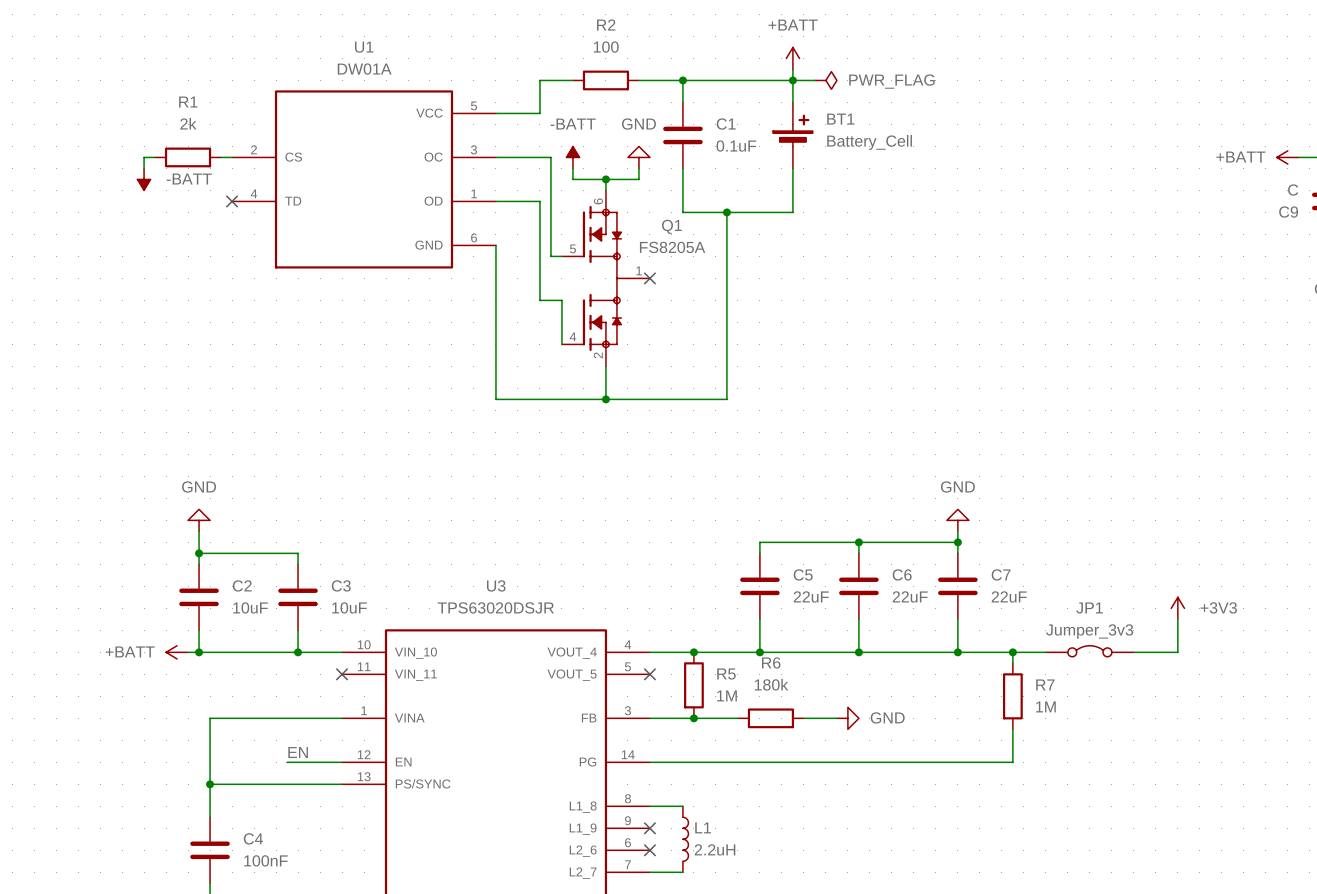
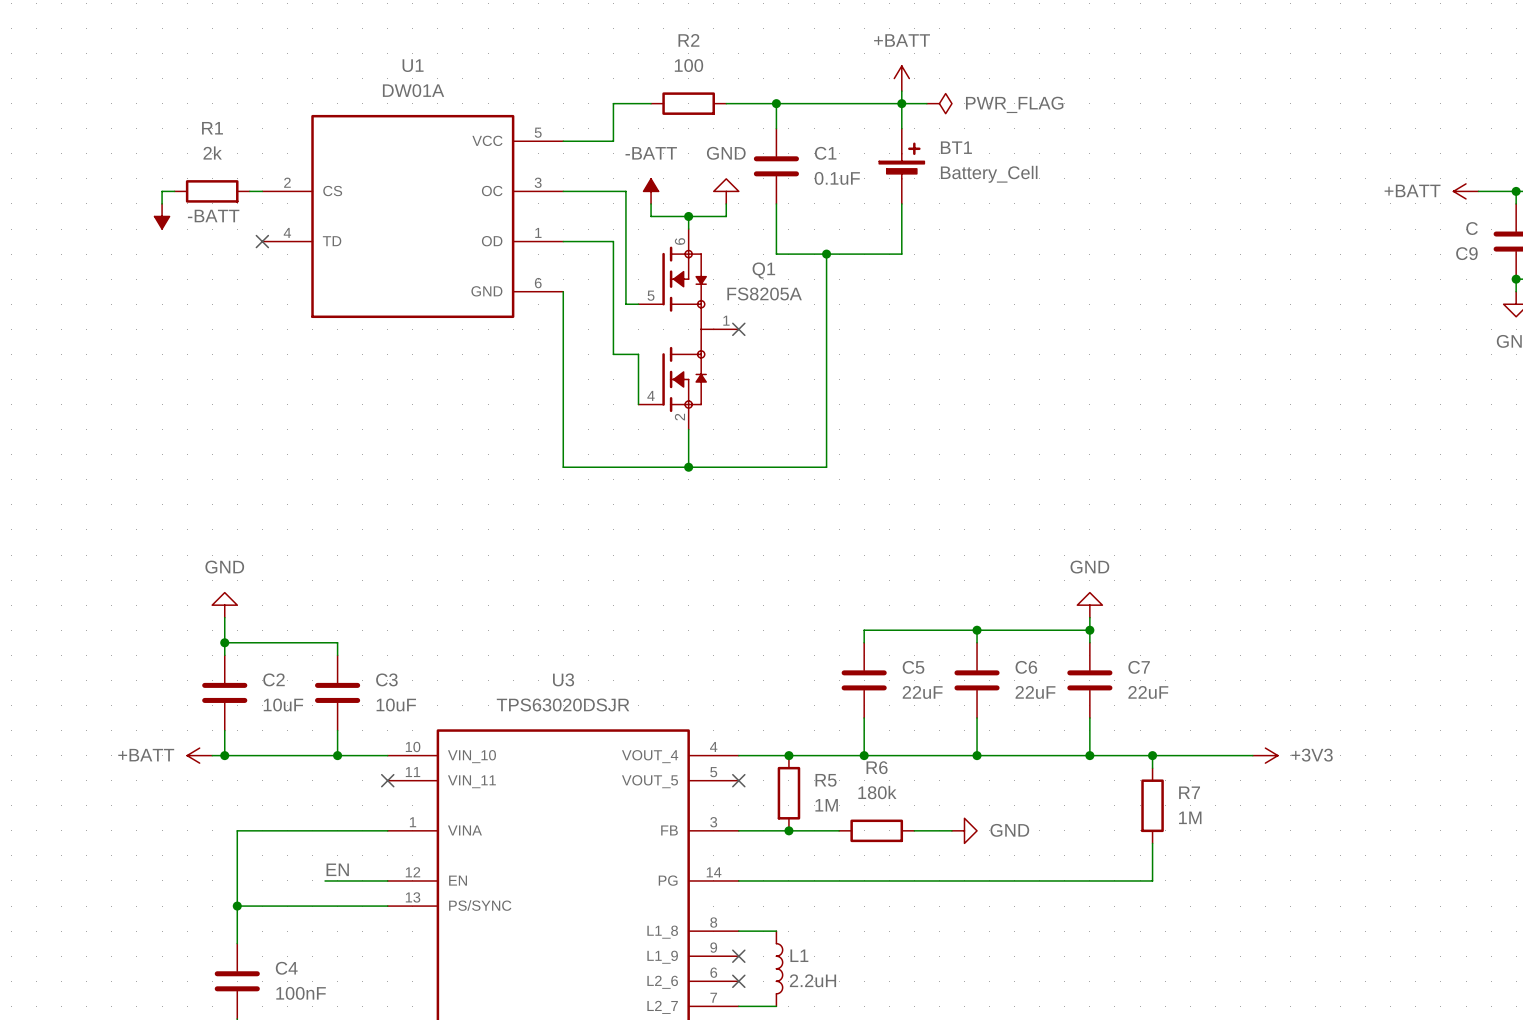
power symbol rotation: 0° (1177, 608) -> 90° clockwise (1265, 755)
power symbol position: +3V3 (1177, 608) -> +3V3 (1265, 755)
wire: (1177, 619) (1177, 652) (1133, 652) -> none
JP1: Jumper_3v3 (1089, 651) -> none
wire: none -> (1190, 755) (1252, 755)

